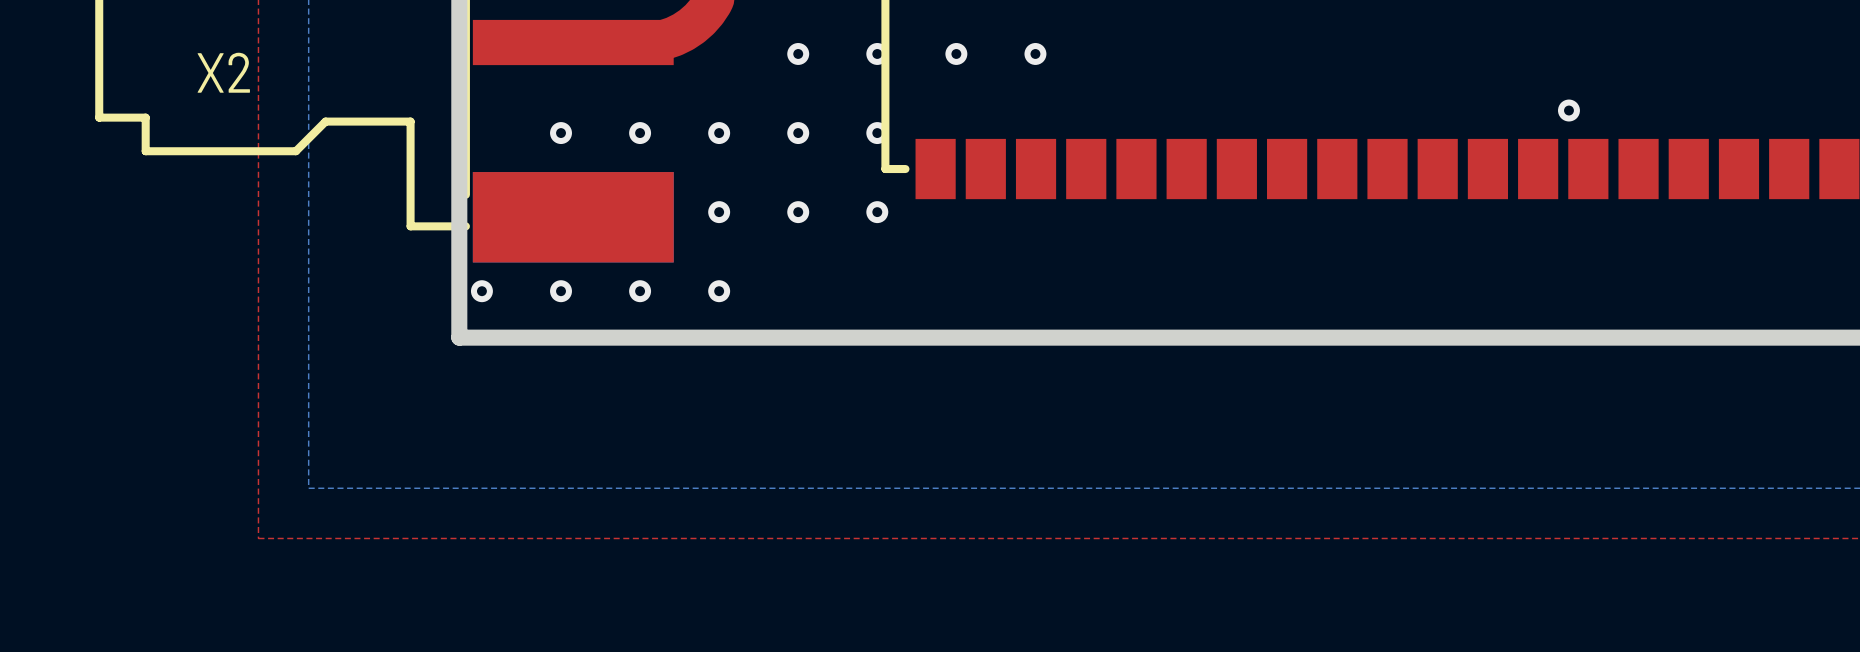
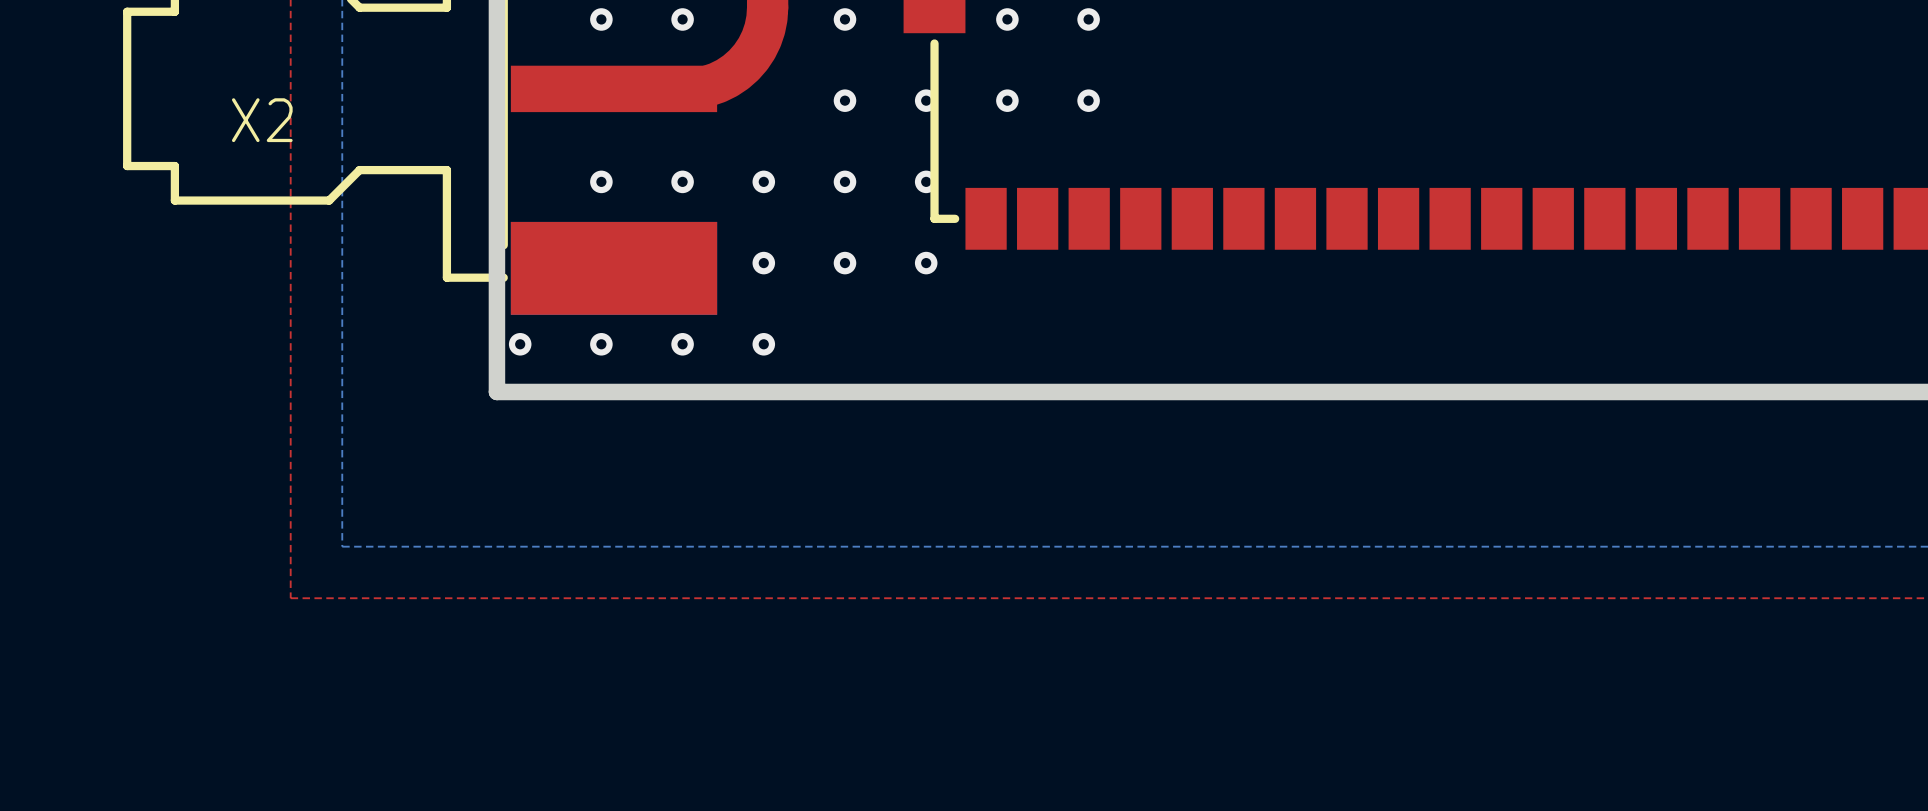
via: (1568, 110) -> none

